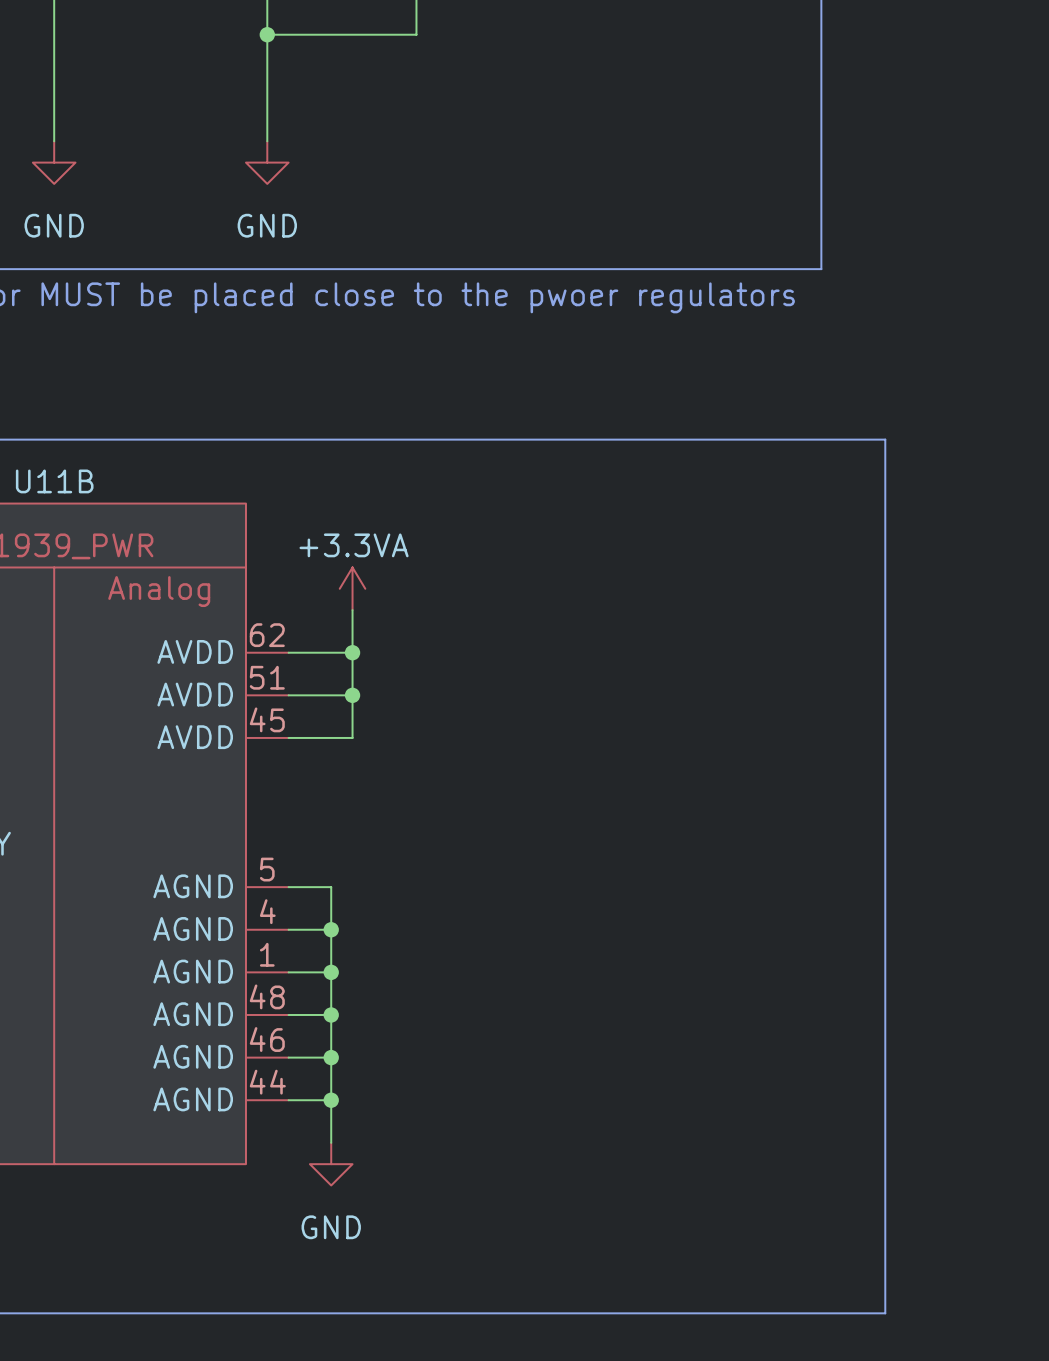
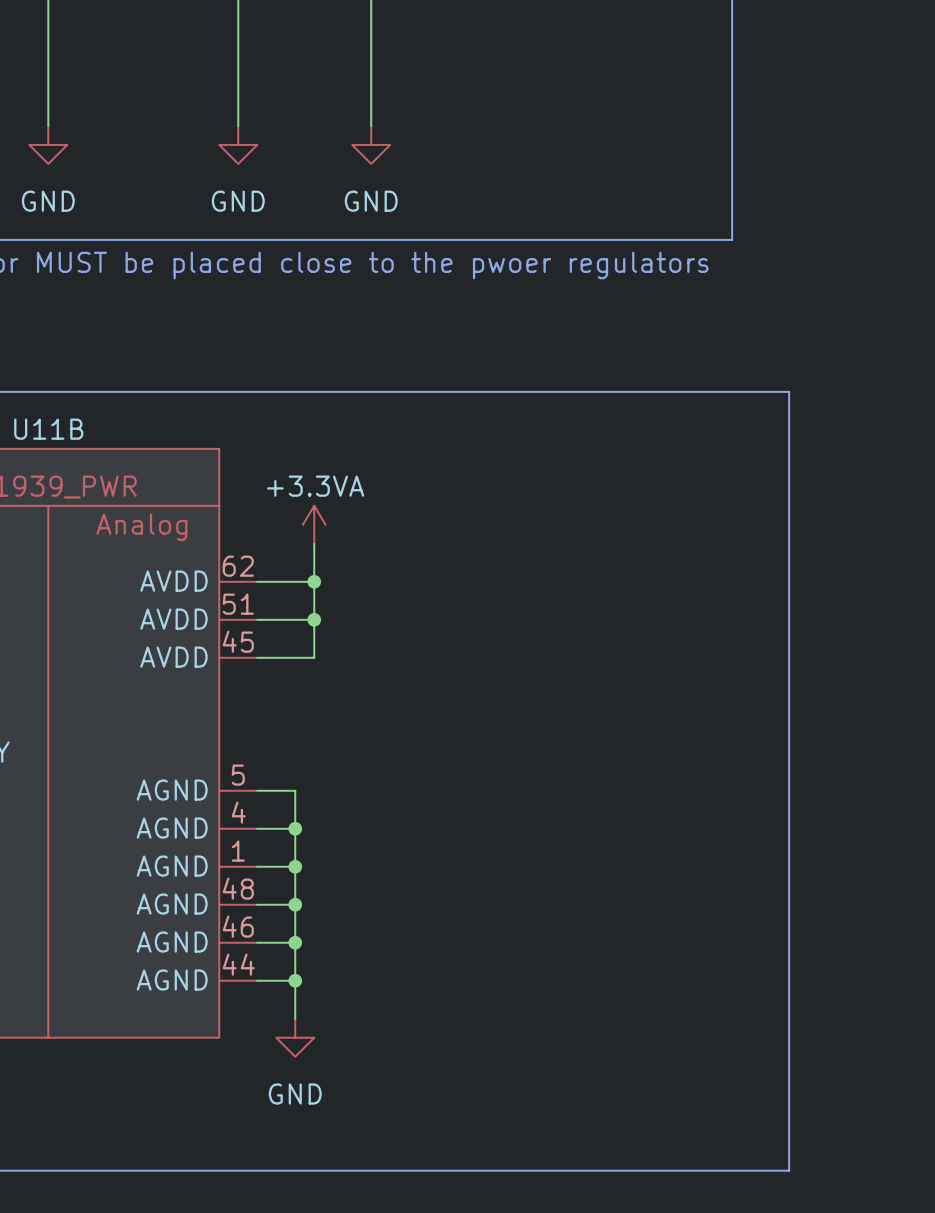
wire: (267, 34) (416, 34) -> (371, 125) (371, 30)
junction: (267, 34) -> none
power symbol: none -> GND (371, 144)

